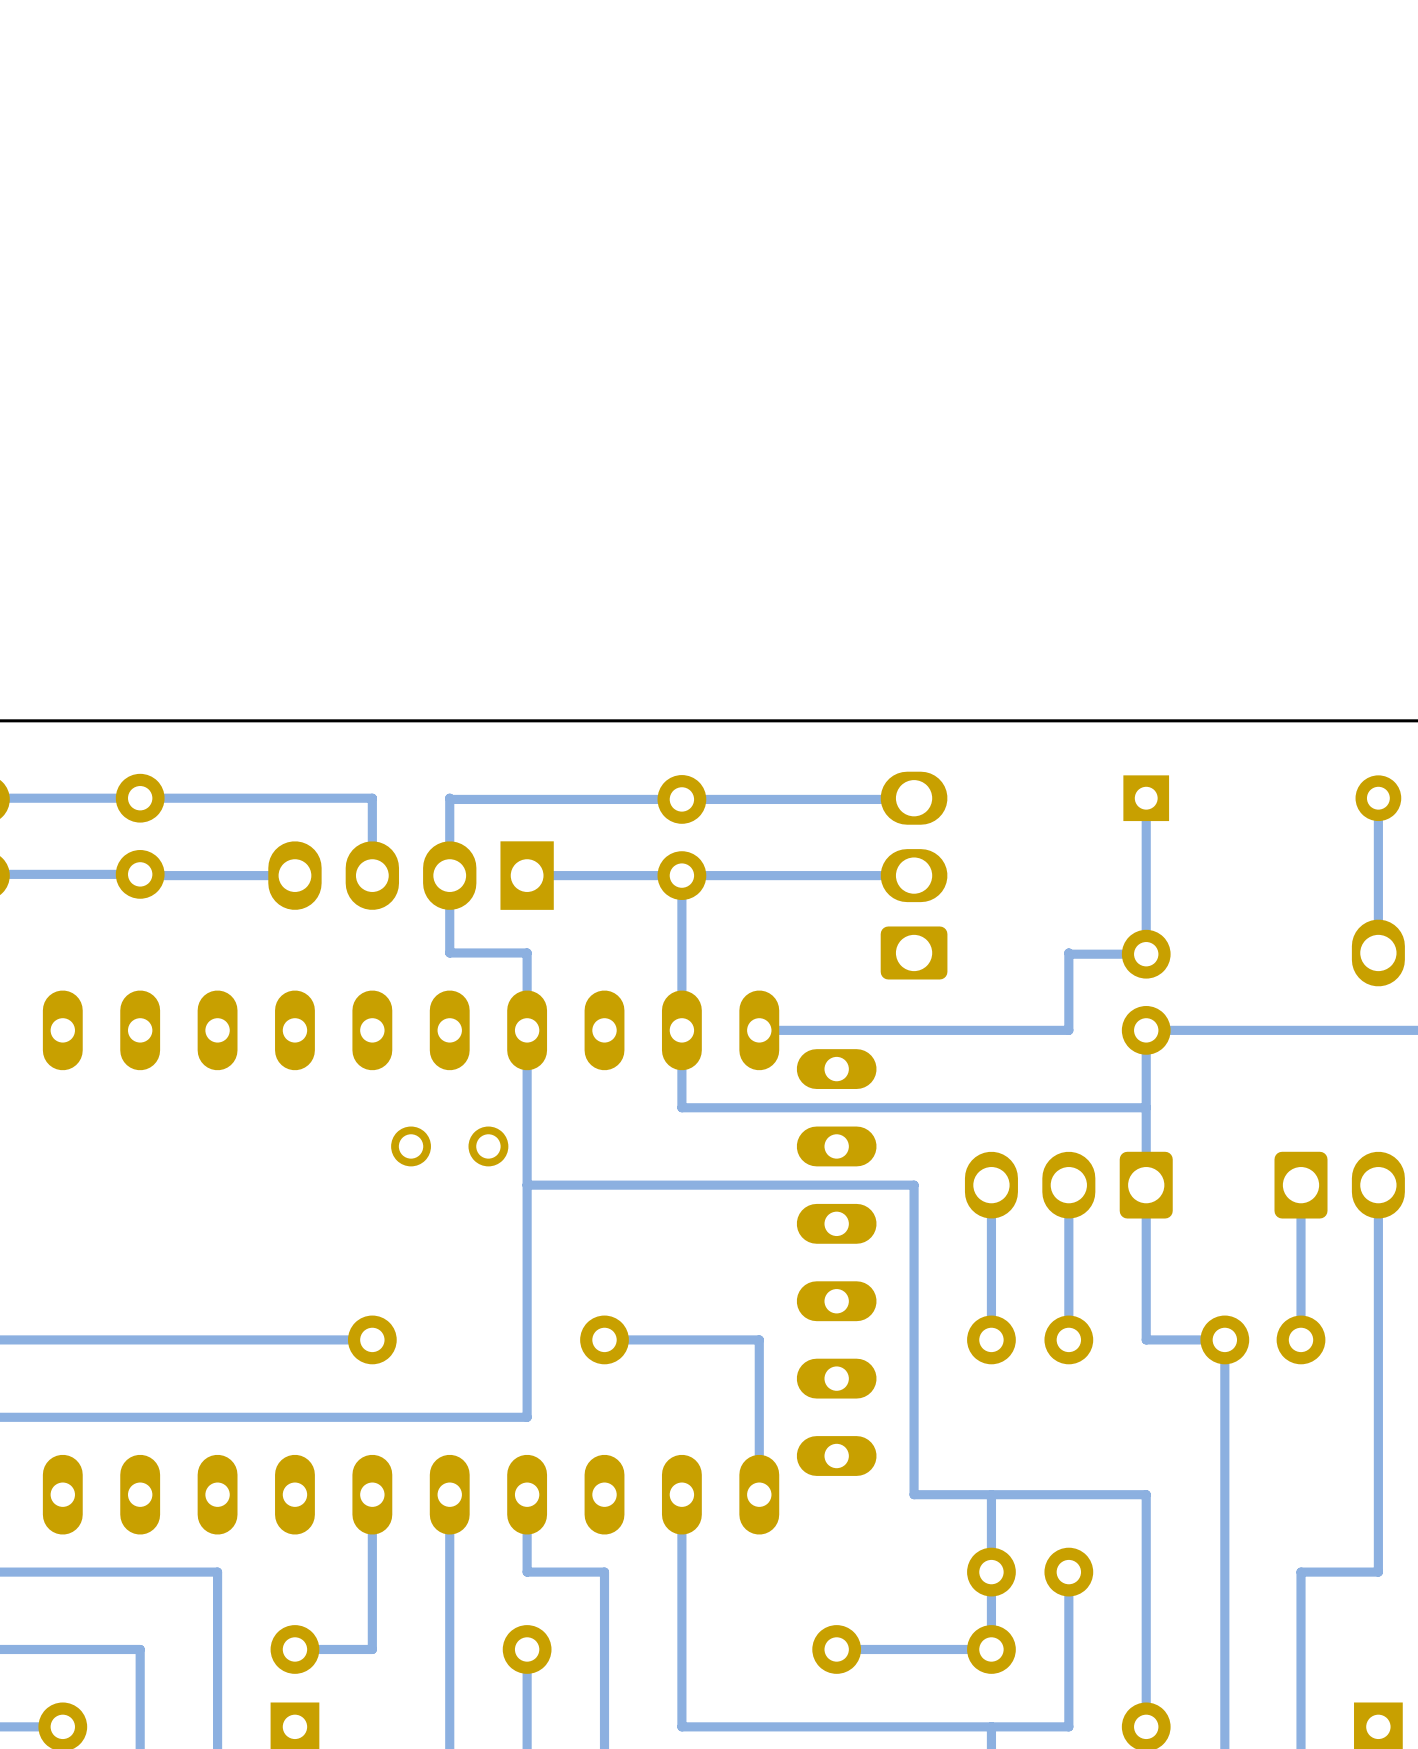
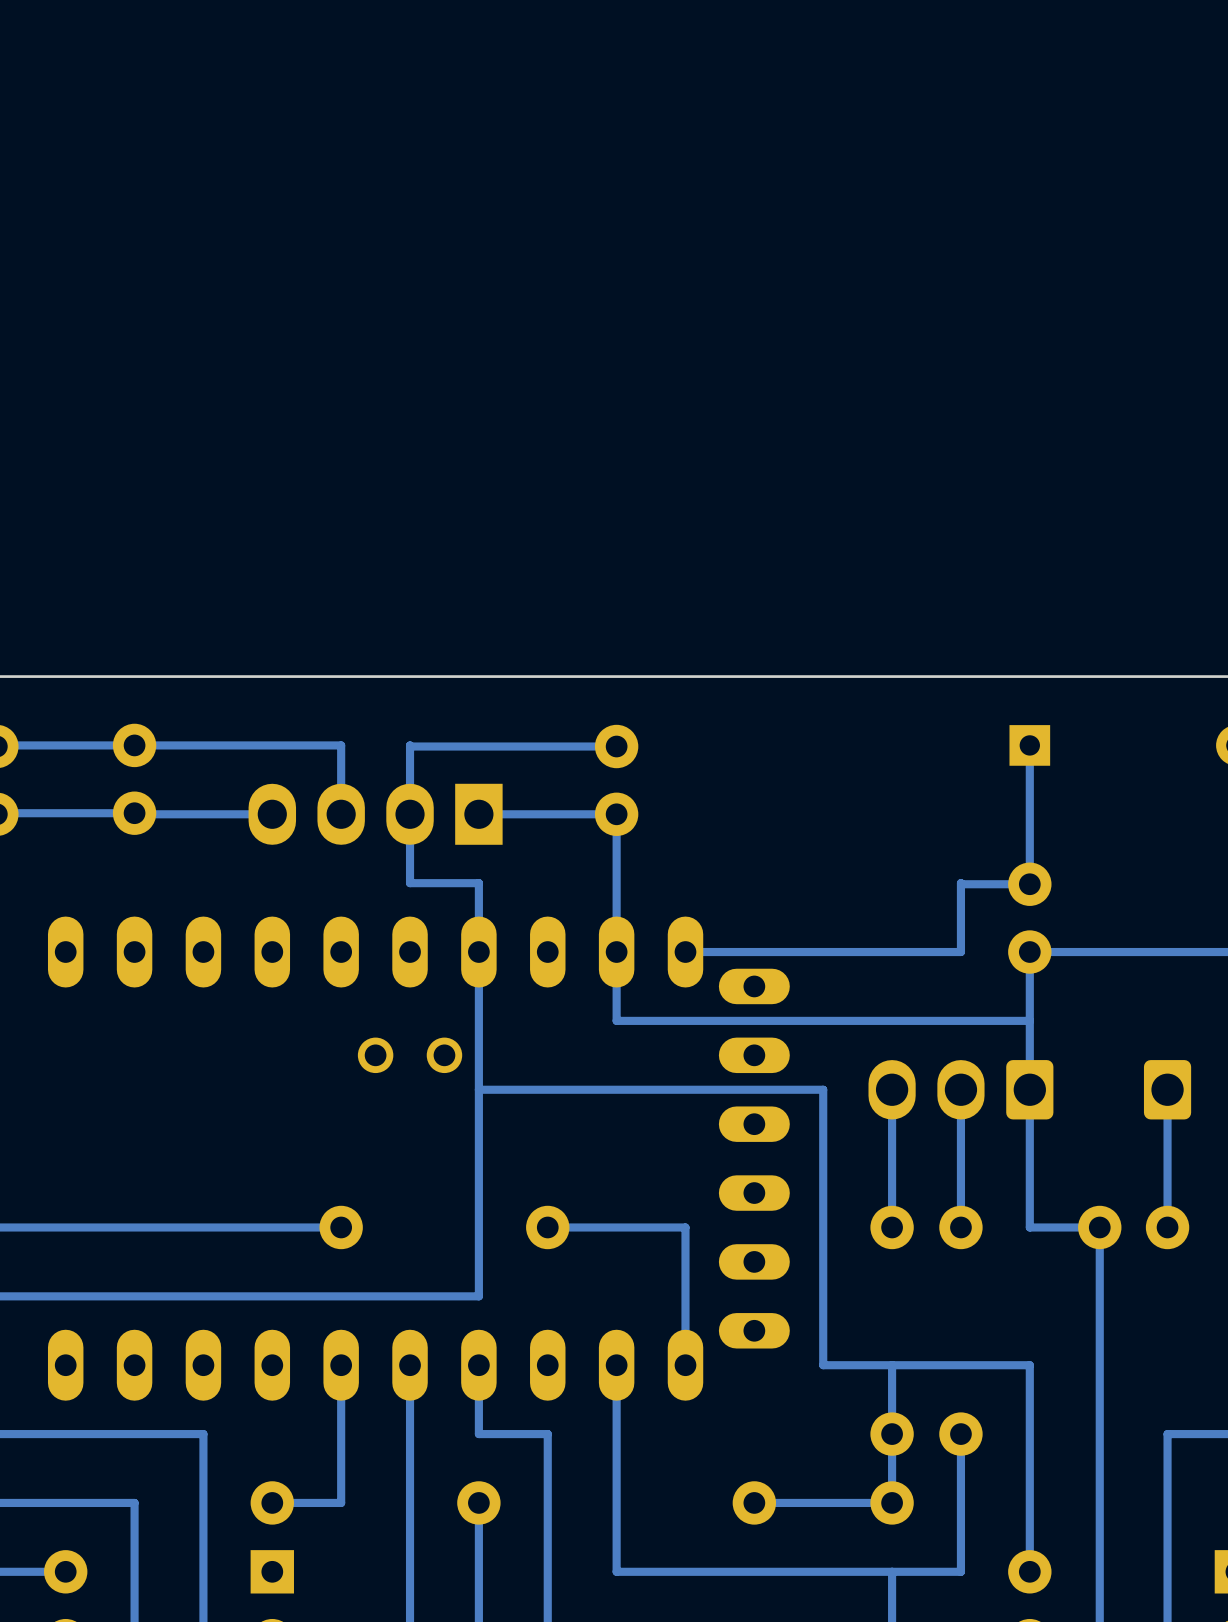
track: (912, 799) (681, 799) -> none
track: (914, 875) (681, 875) -> none
part: (914, 875) -> none

